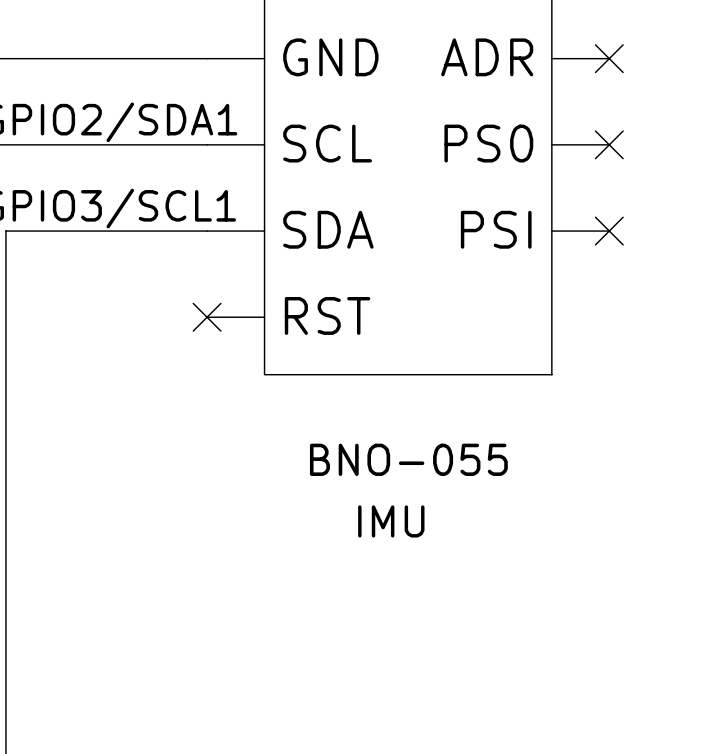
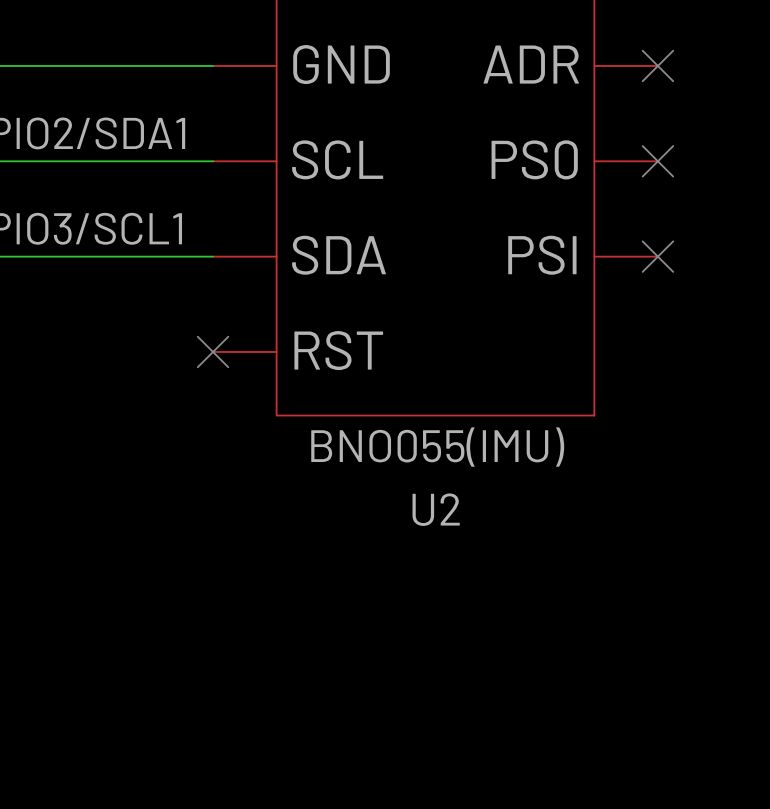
BNO-055 value: none -> BNO055(IMU) (437, 447)
BNO-055 name: BNO-055 (408, 459) -> U2 (436, 509)
label: IMU (391, 521) -> none

